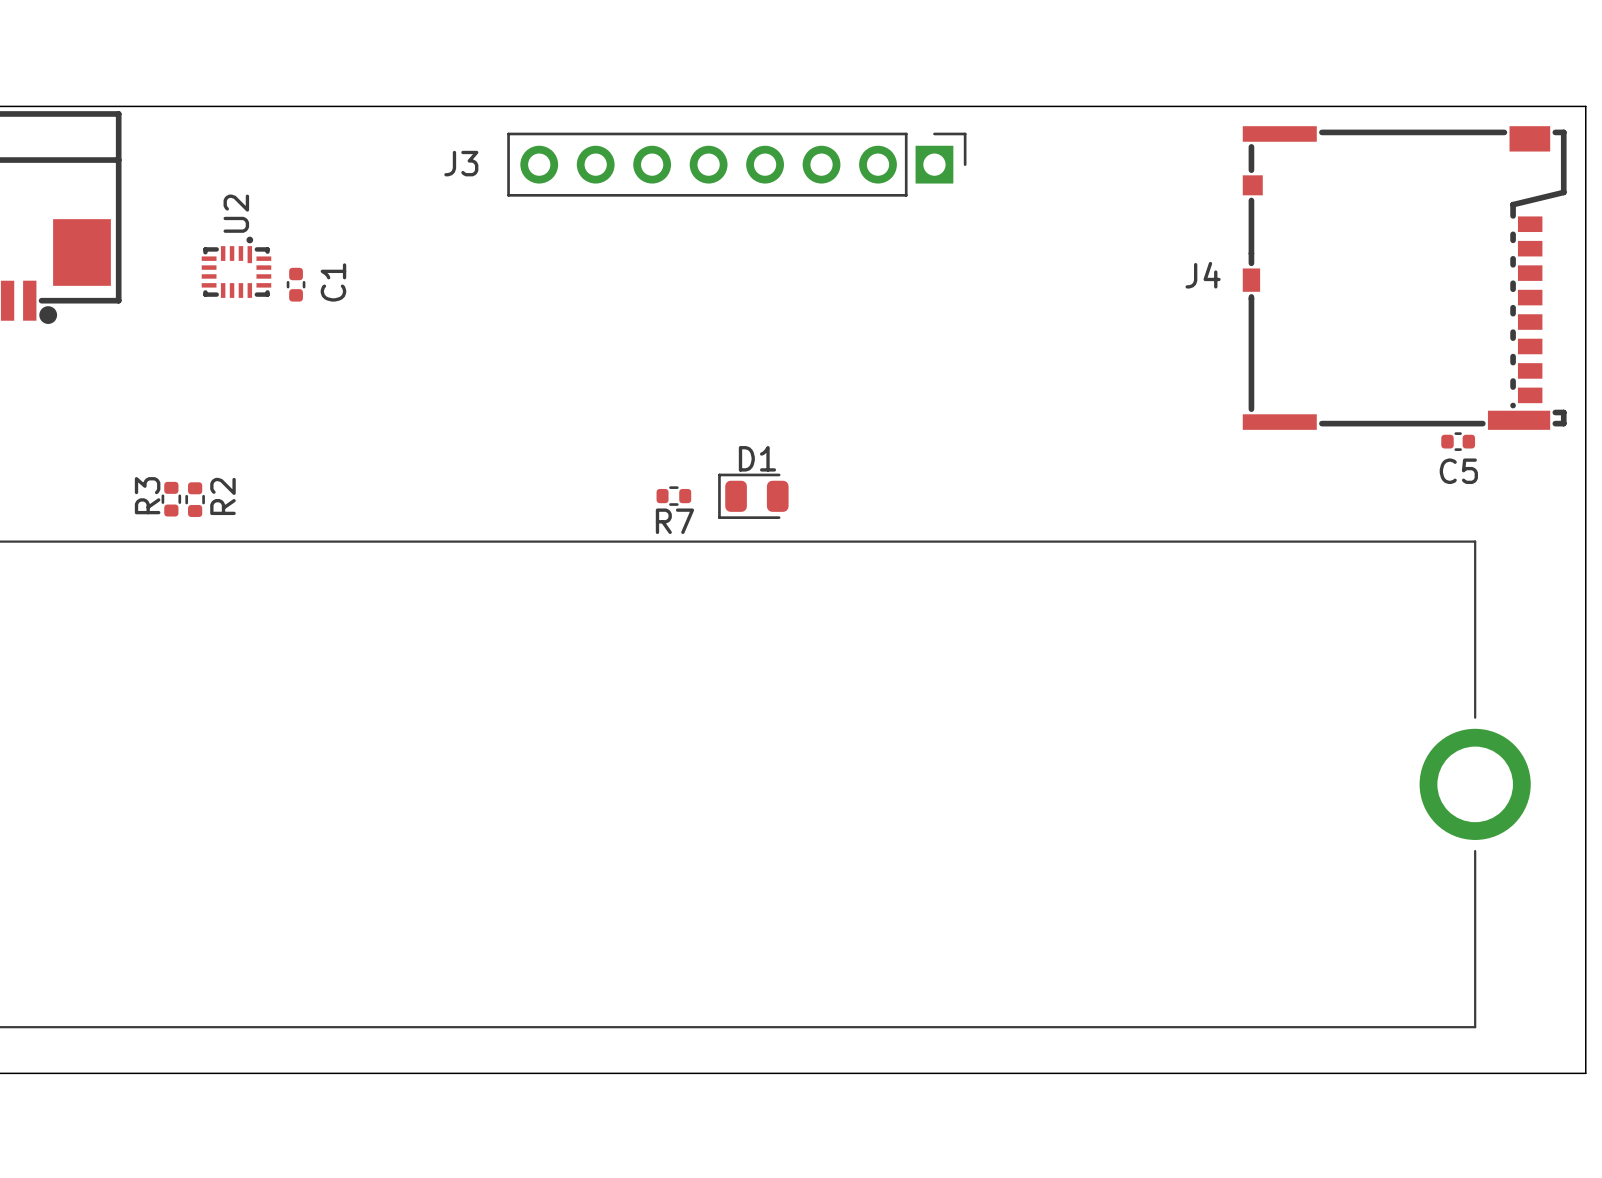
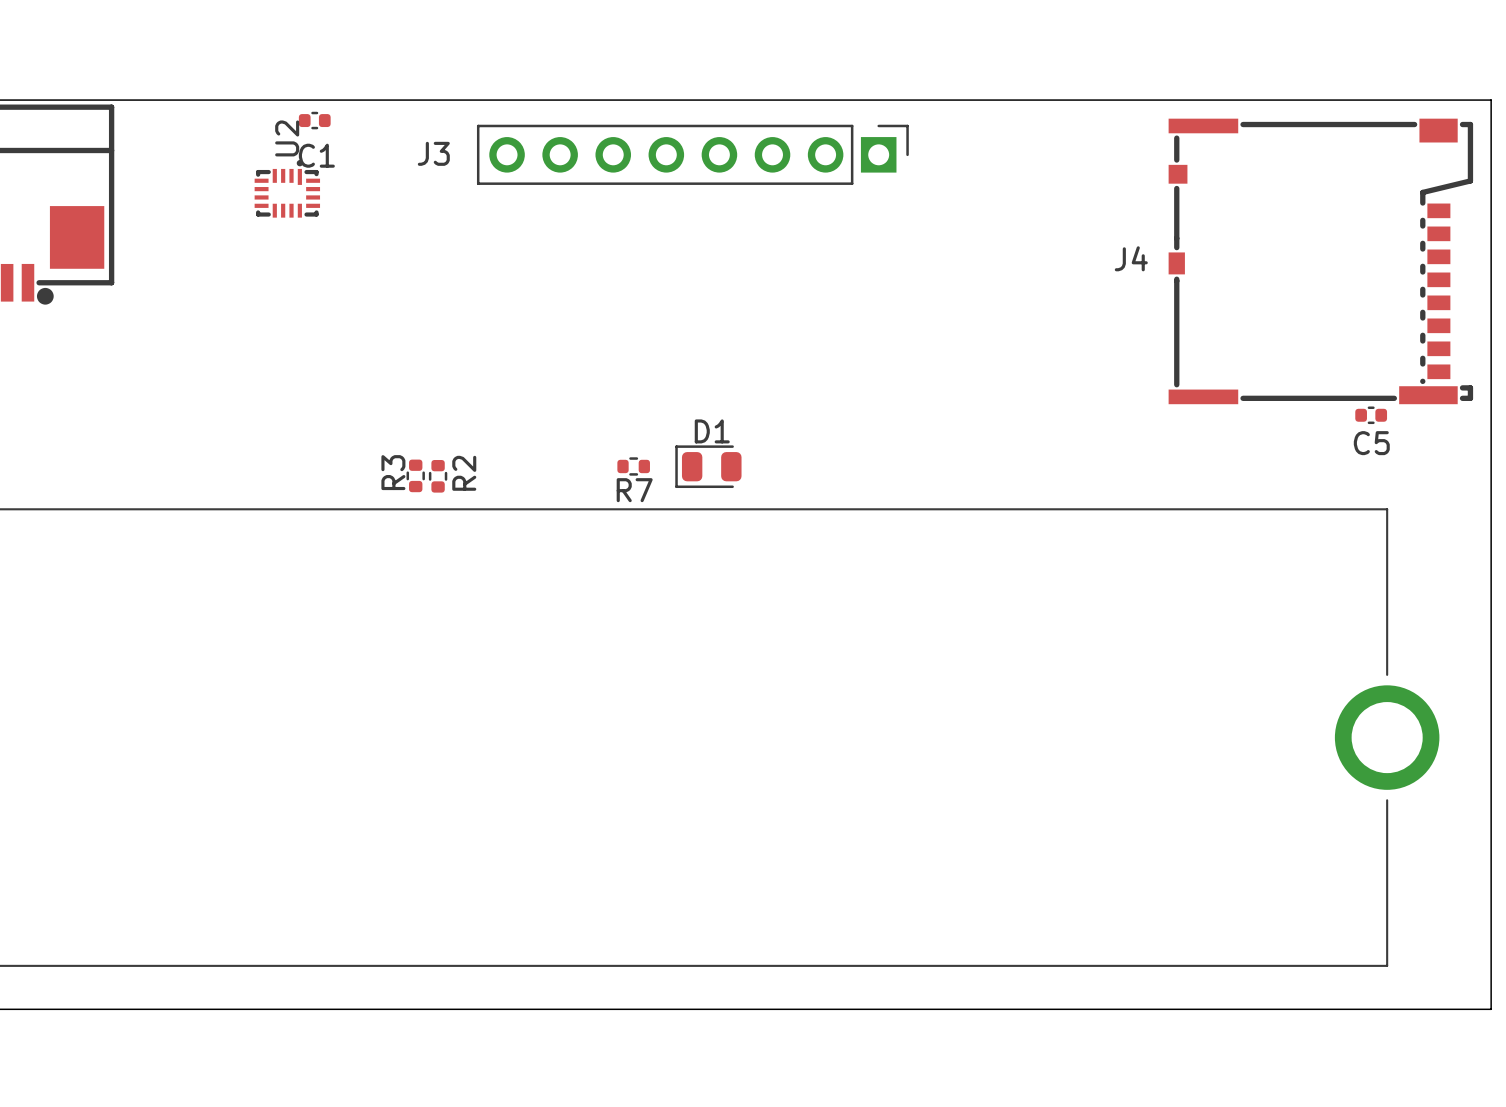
U2 position: (236, 267) -> (287, 188)
C1 rotation: 0° (296, 284) -> 90° clockwise (314, 120)
C1 position: (296, 284) -> (314, 120)
R3 position: (171, 499) -> (415, 475)
R2 position: (195, 499) -> (438, 476)

